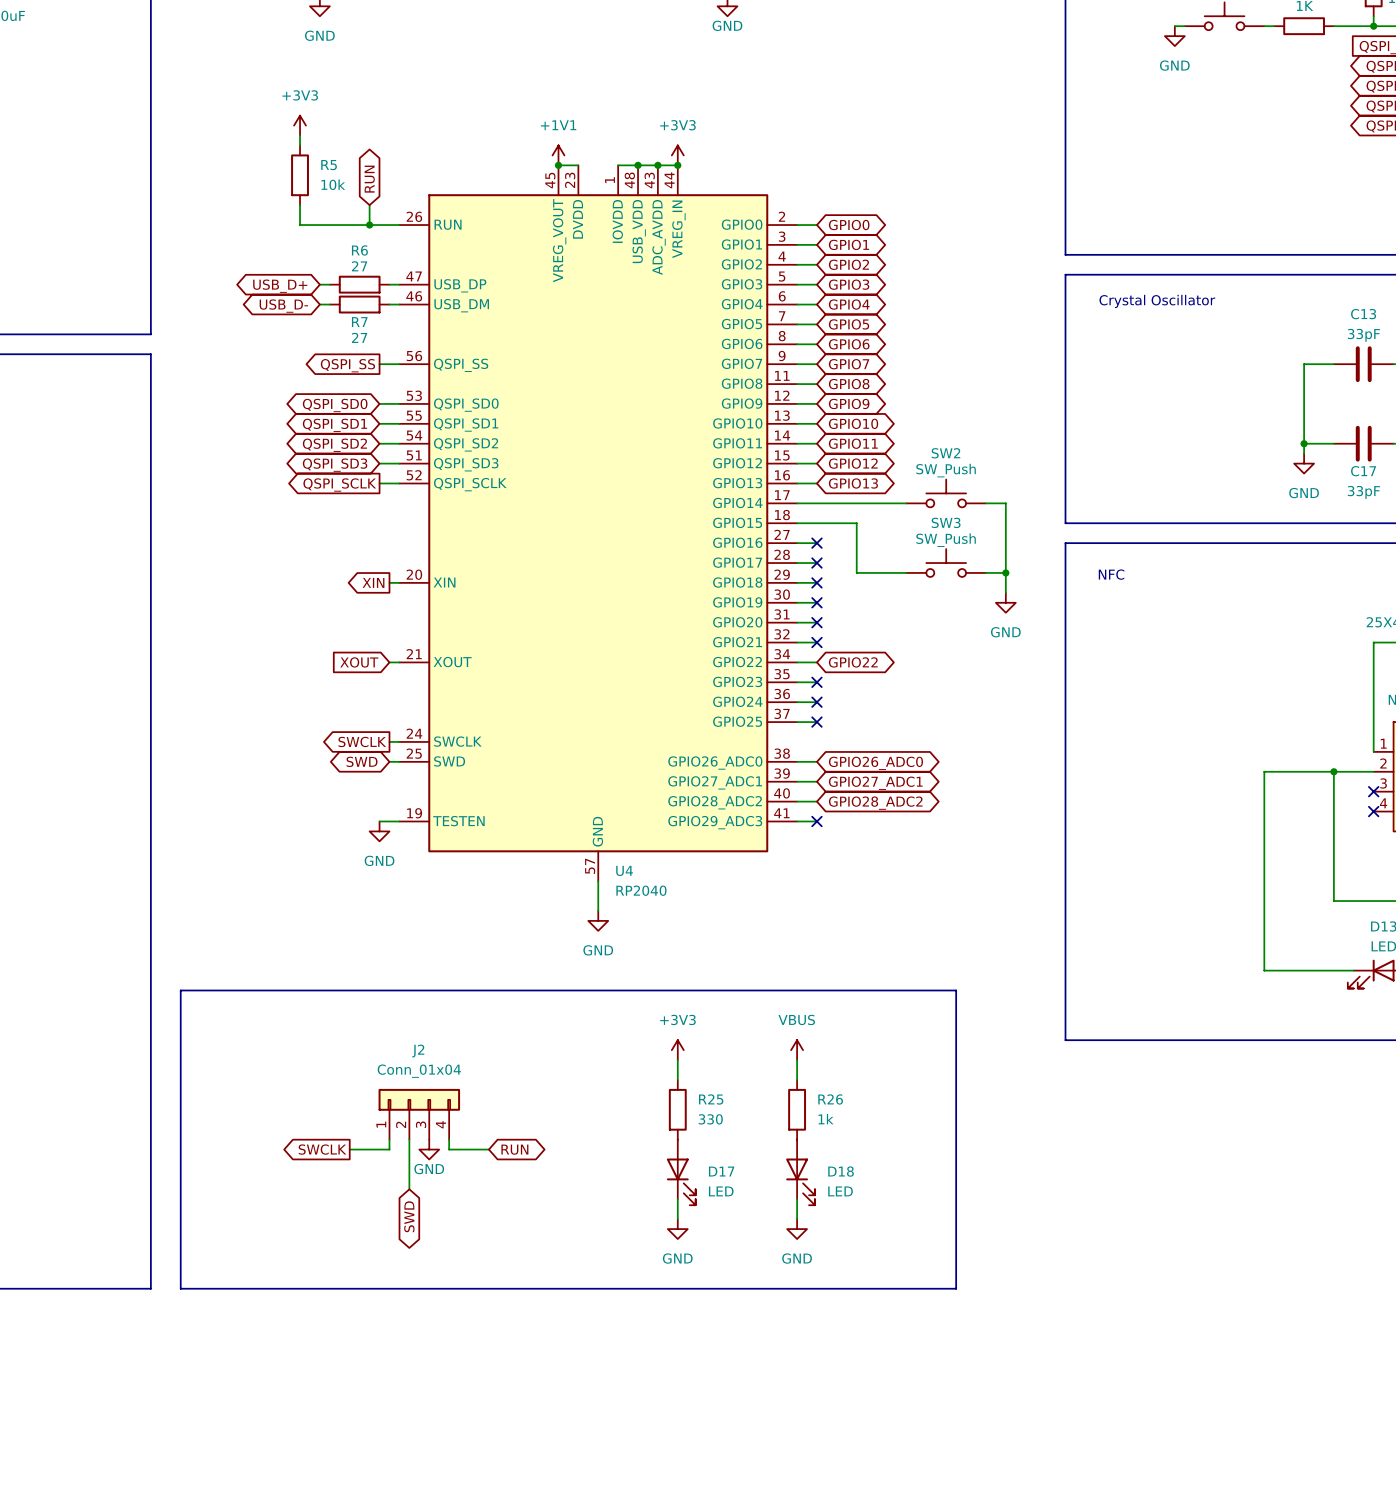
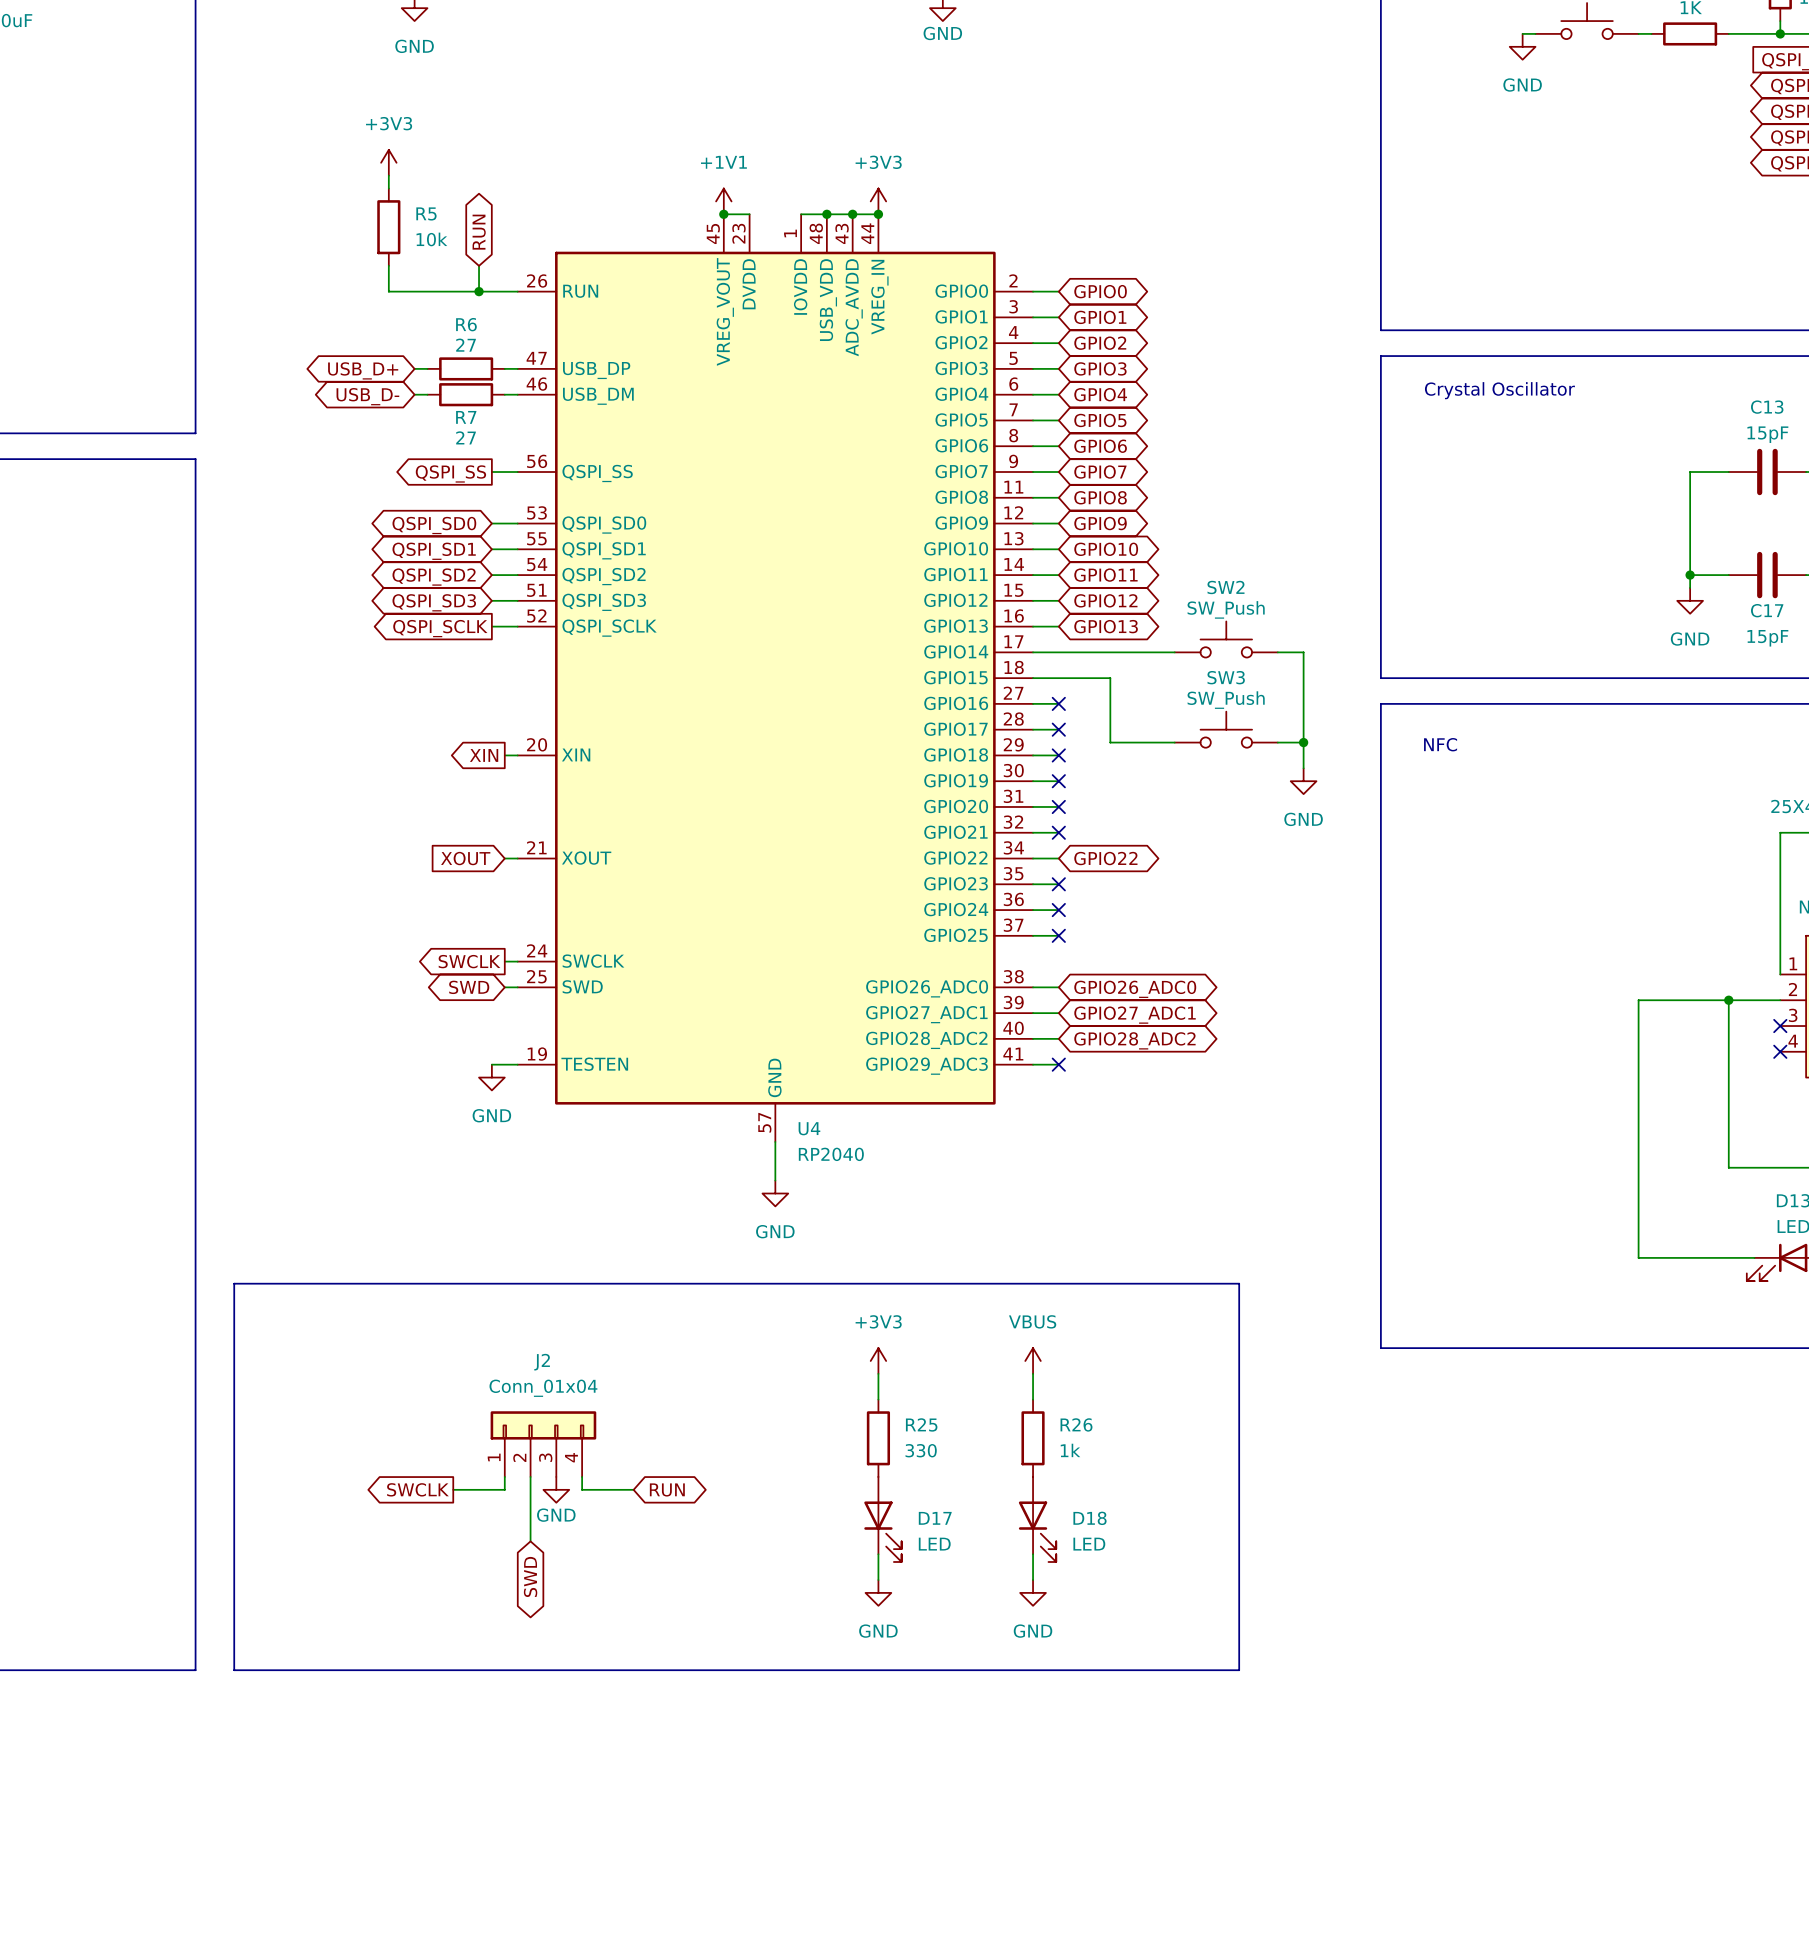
C13 value: 33pF (1363, 335) -> 15pF (1767, 434)
C17 value: 33pF (1363, 492) -> 15pF (1767, 638)

